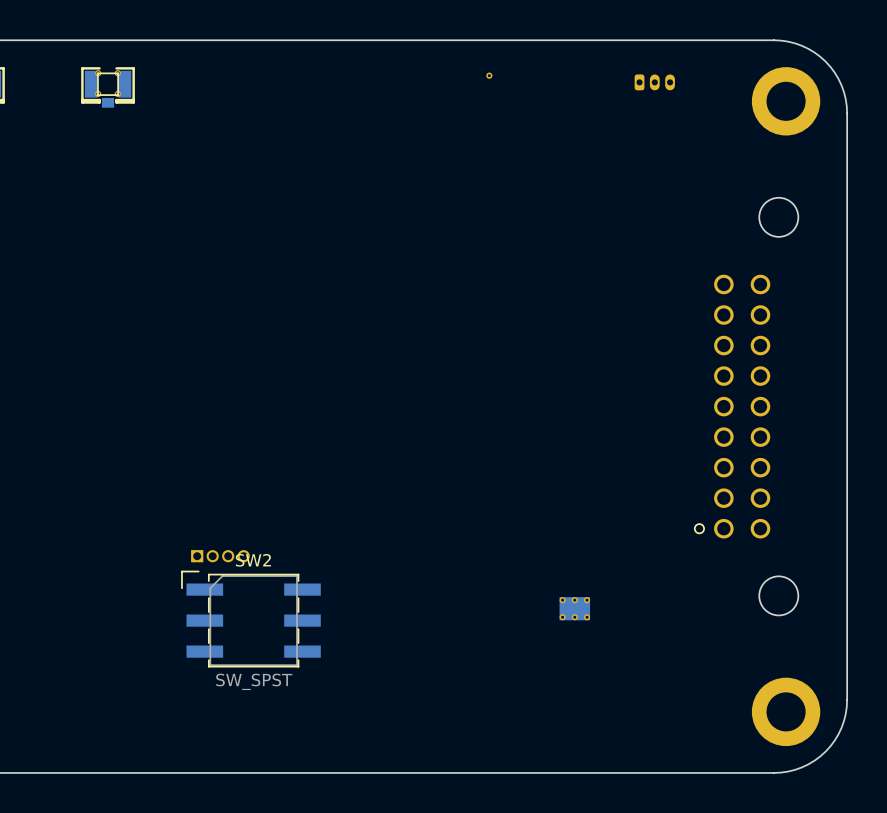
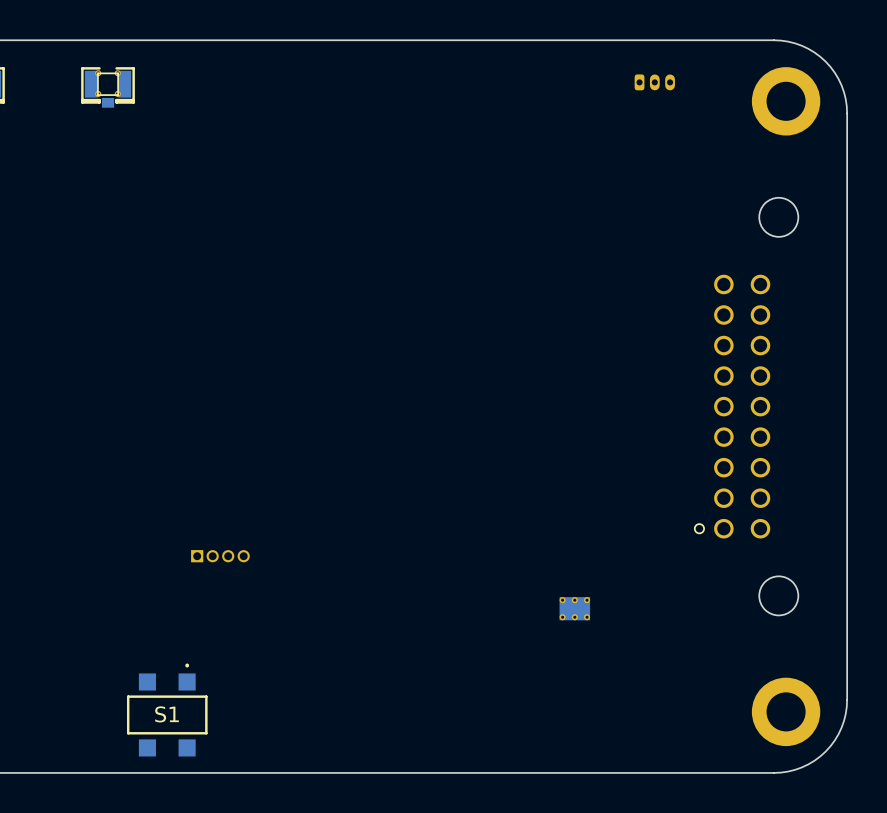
part: (489, 75) -> none
SW2: SW_SPST (251, 619) -> none
S1: none -> (167, 710)

